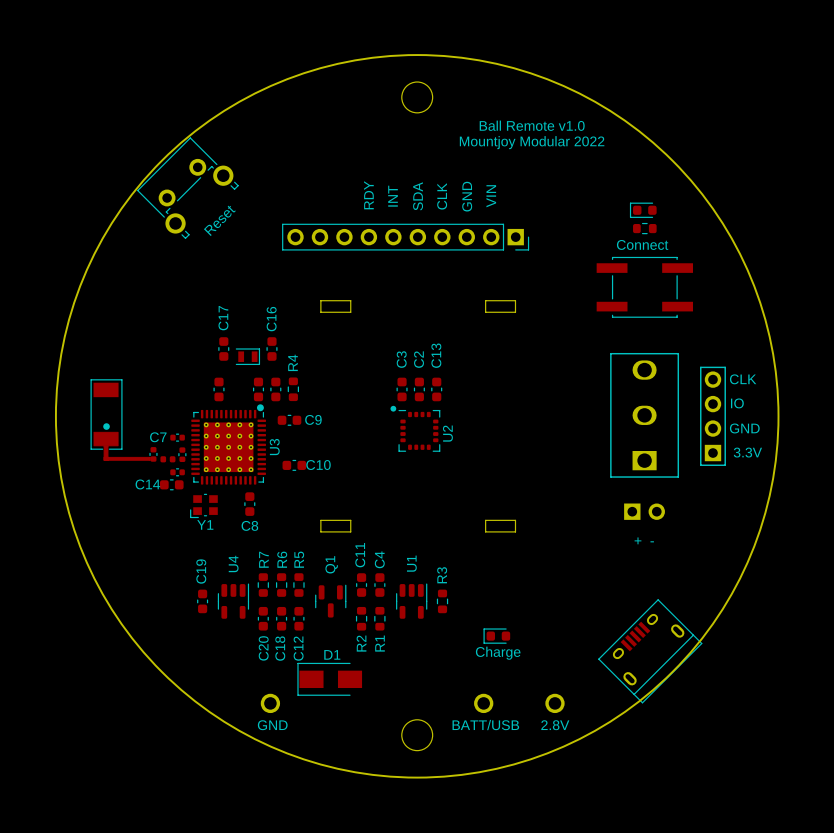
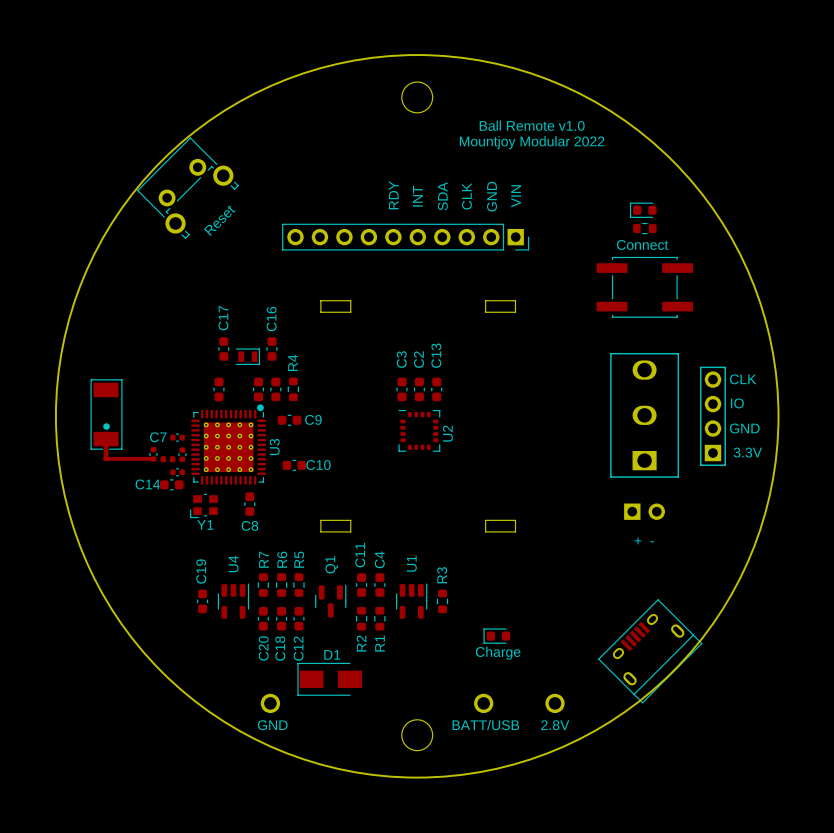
text: RDY (368, 195) -> none
text: INT (393, 196) -> RDY (393, 195)
text: SDA (418, 196) -> INT (417, 196)
text: CLK (442, 196) -> SDA (442, 196)
text: GND (467, 196) -> CLK (466, 196)
text: VIN (491, 196) -> GND (492, 196)
text: none -> VIN (516, 196)
drawing: [390, 405, 397, 412] -> none

